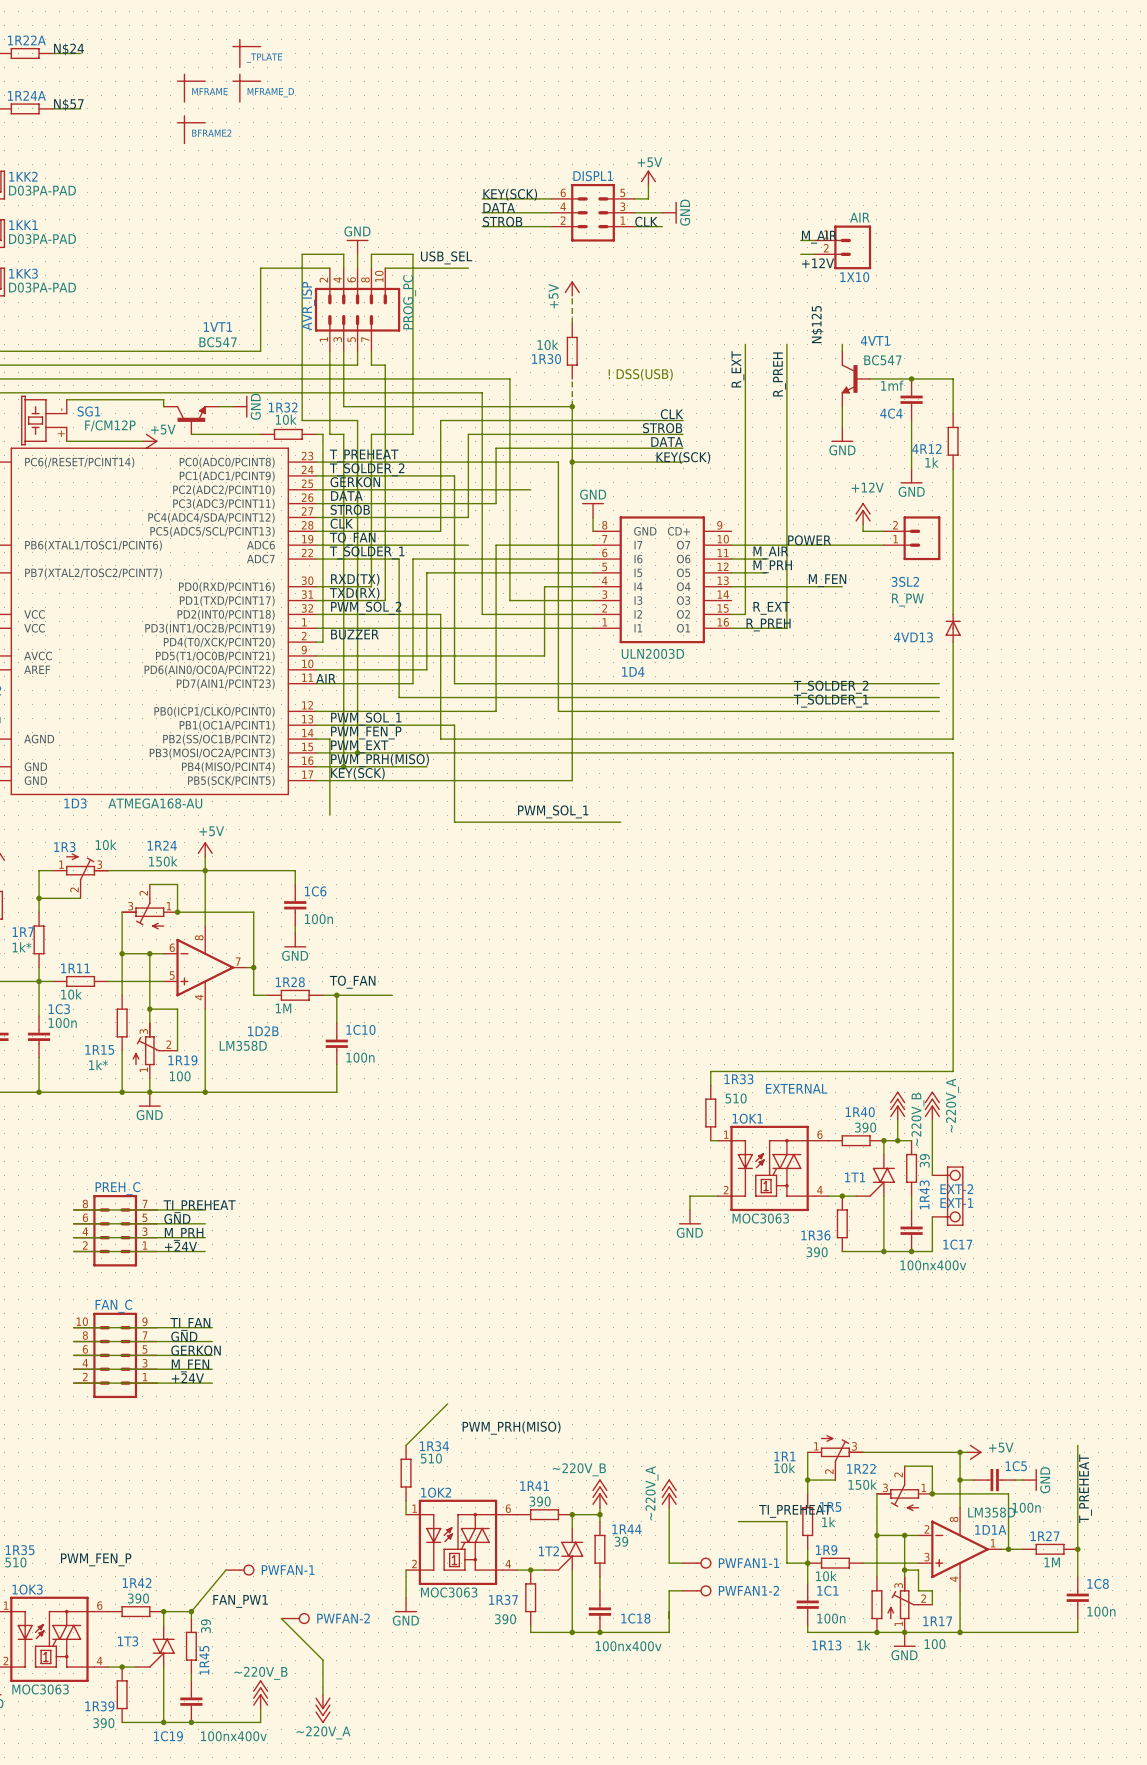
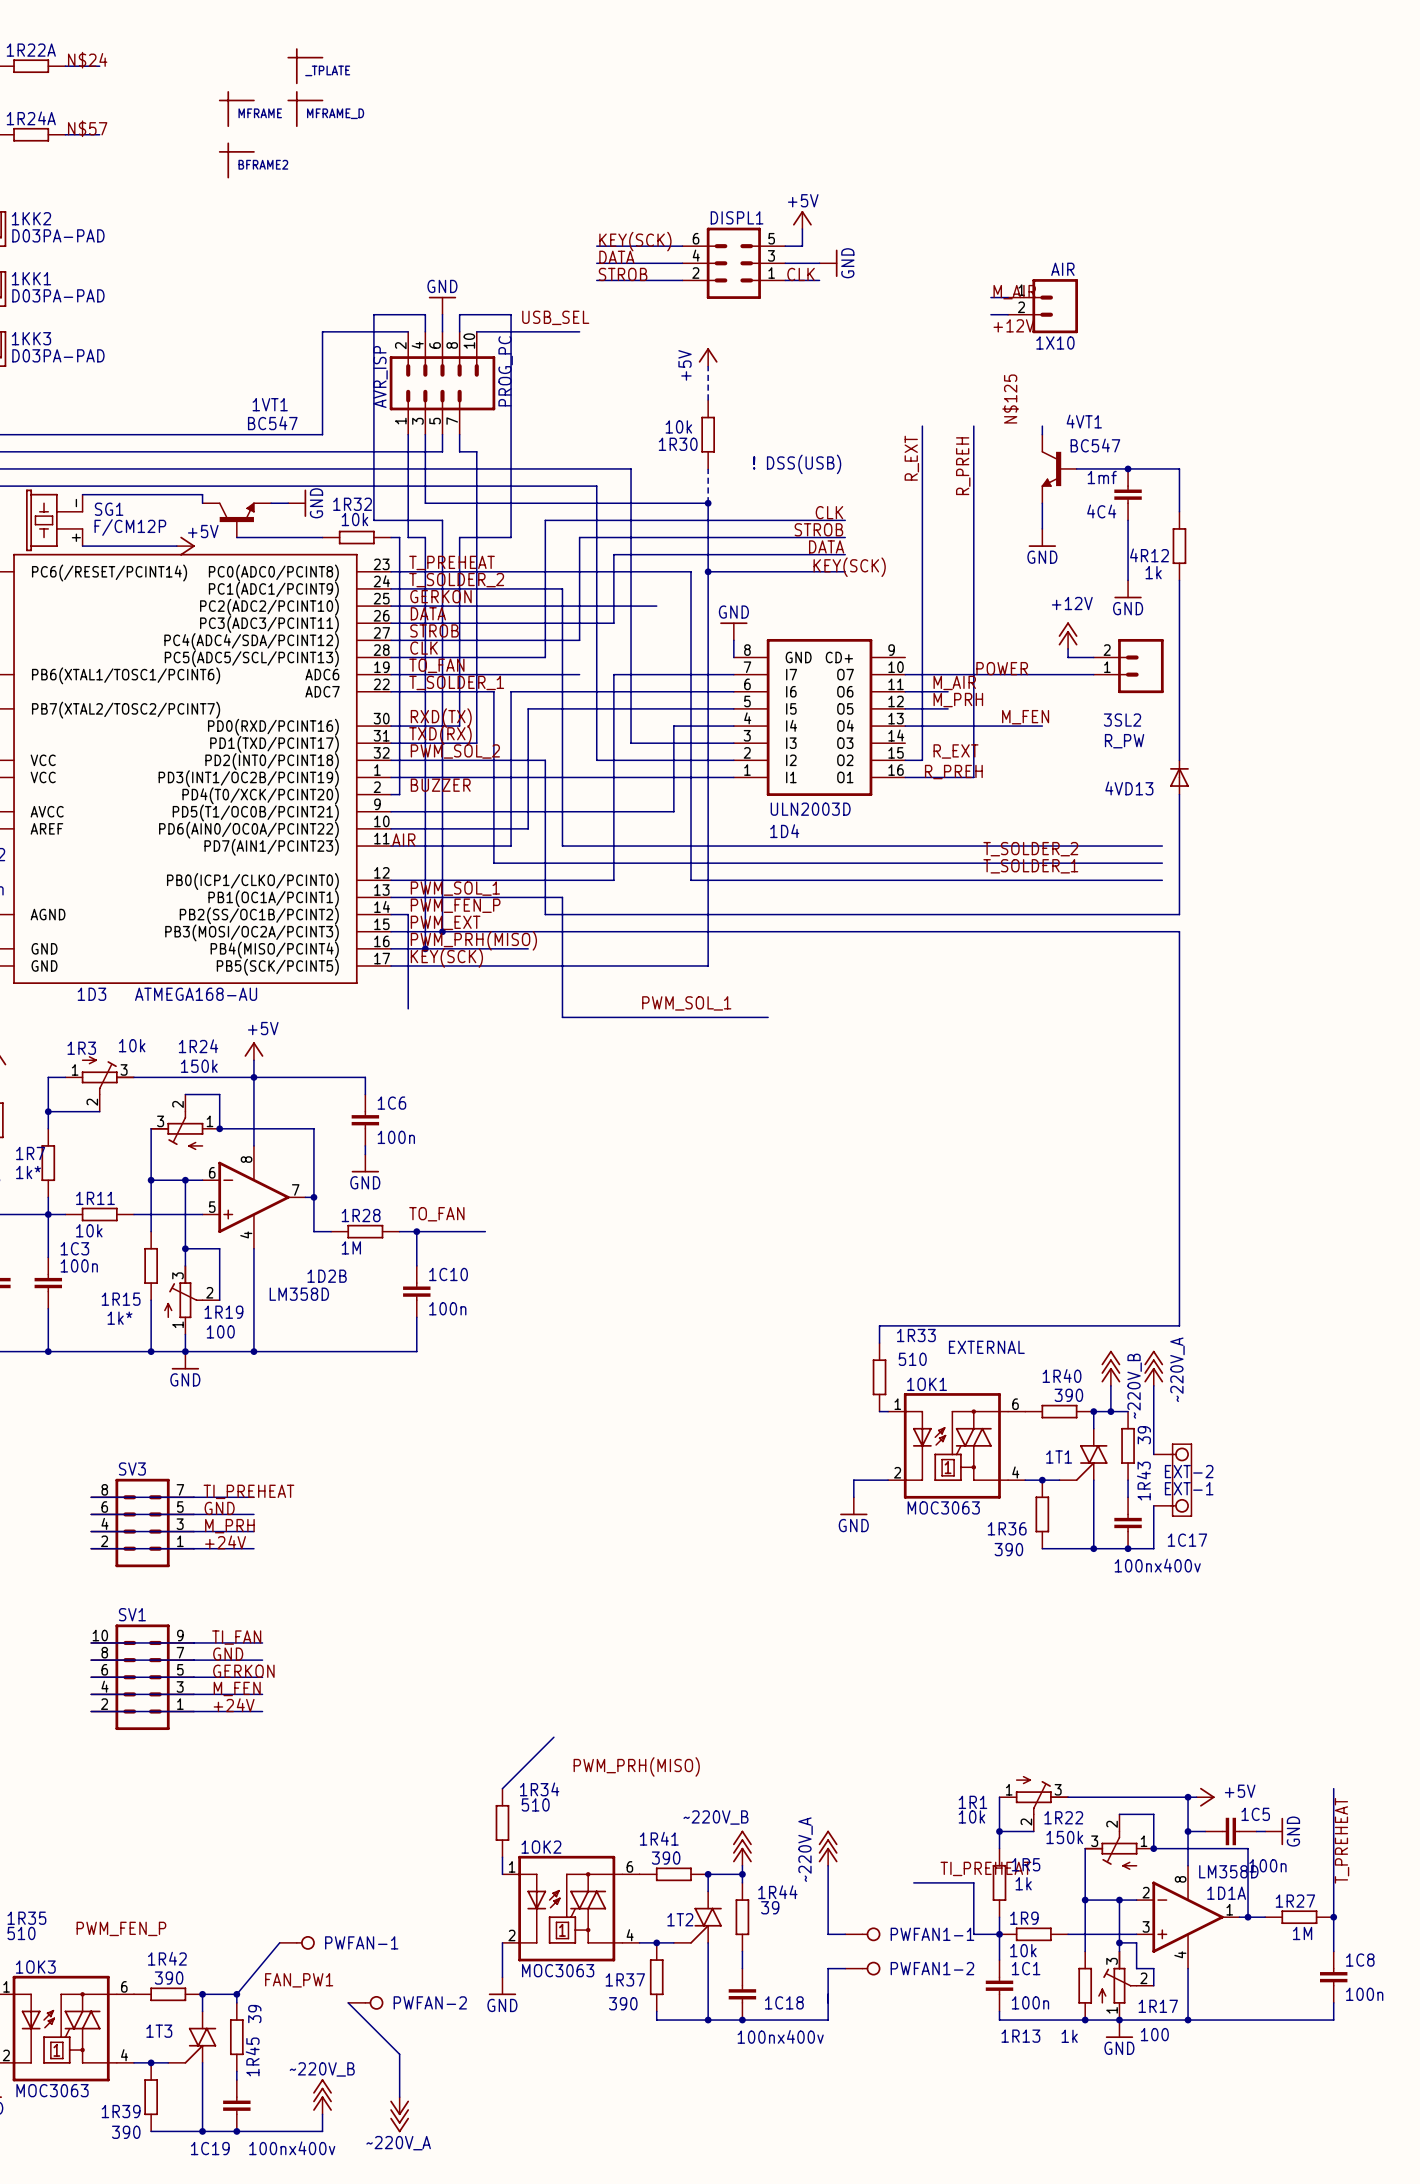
PREH_C name: PREH_C (117, 1188) -> SV3 (132, 1469)
FAN_C name: FAN_C (113, 1306) -> SV1 (132, 1614)

